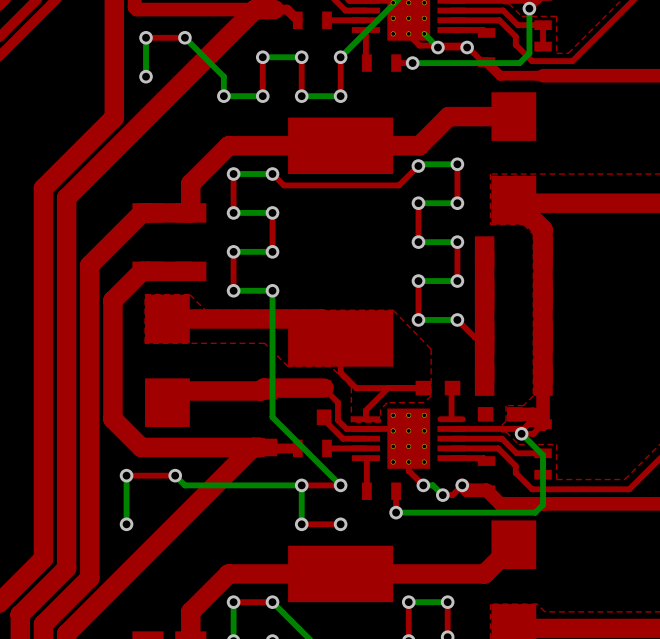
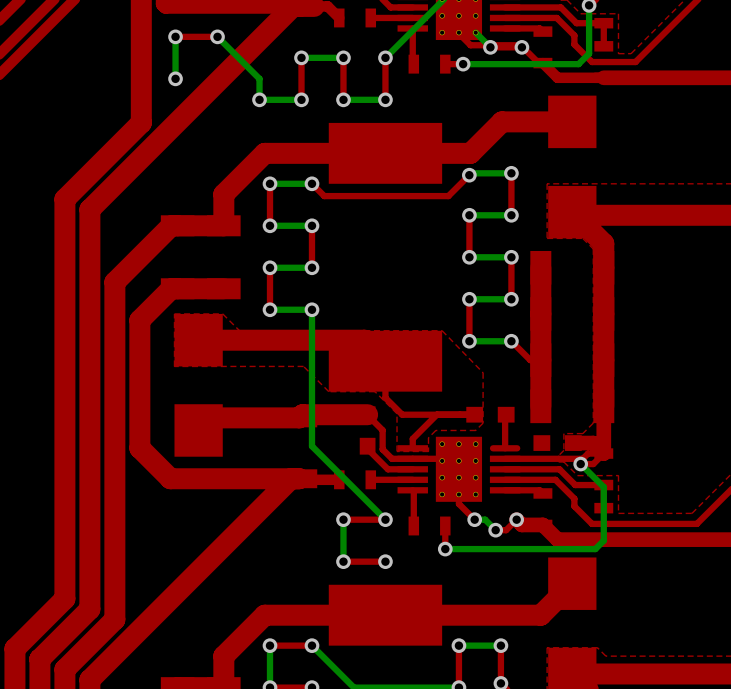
bottom track: (126, 475) (126, 524) -> none
via: (126, 475) -> none
top track: (175, 475) (126, 475) -> none
bottom track: (175, 475) (184, 485) (301, 485) -> none
via: (175, 475) -> none
via: (126, 524) -> none

